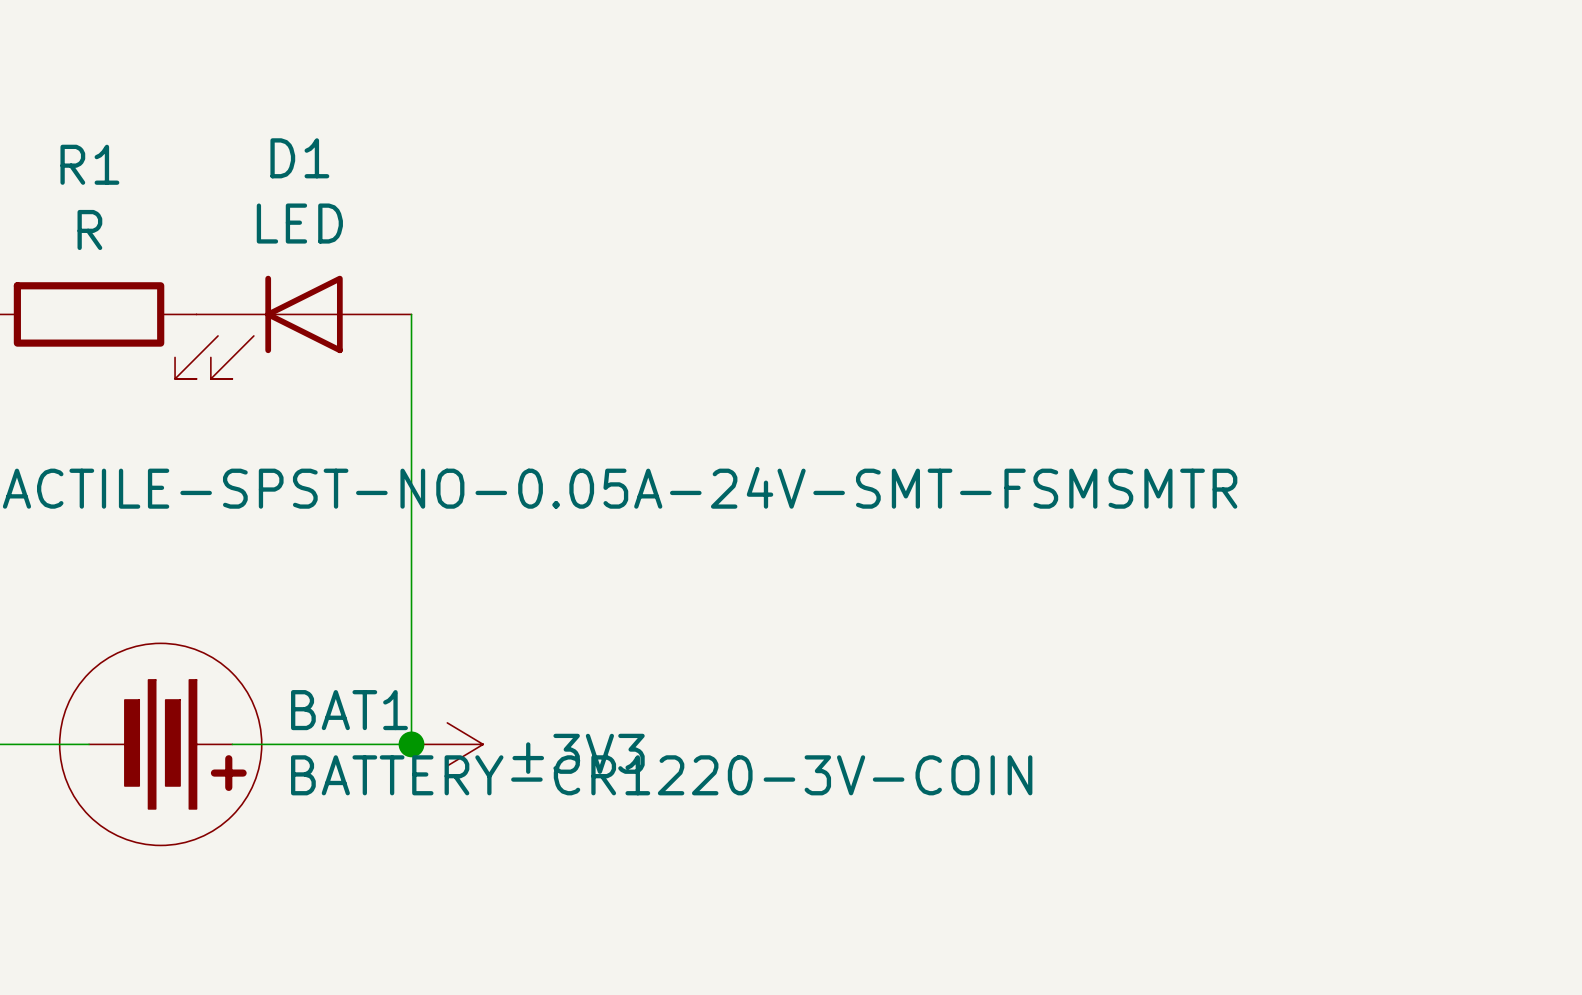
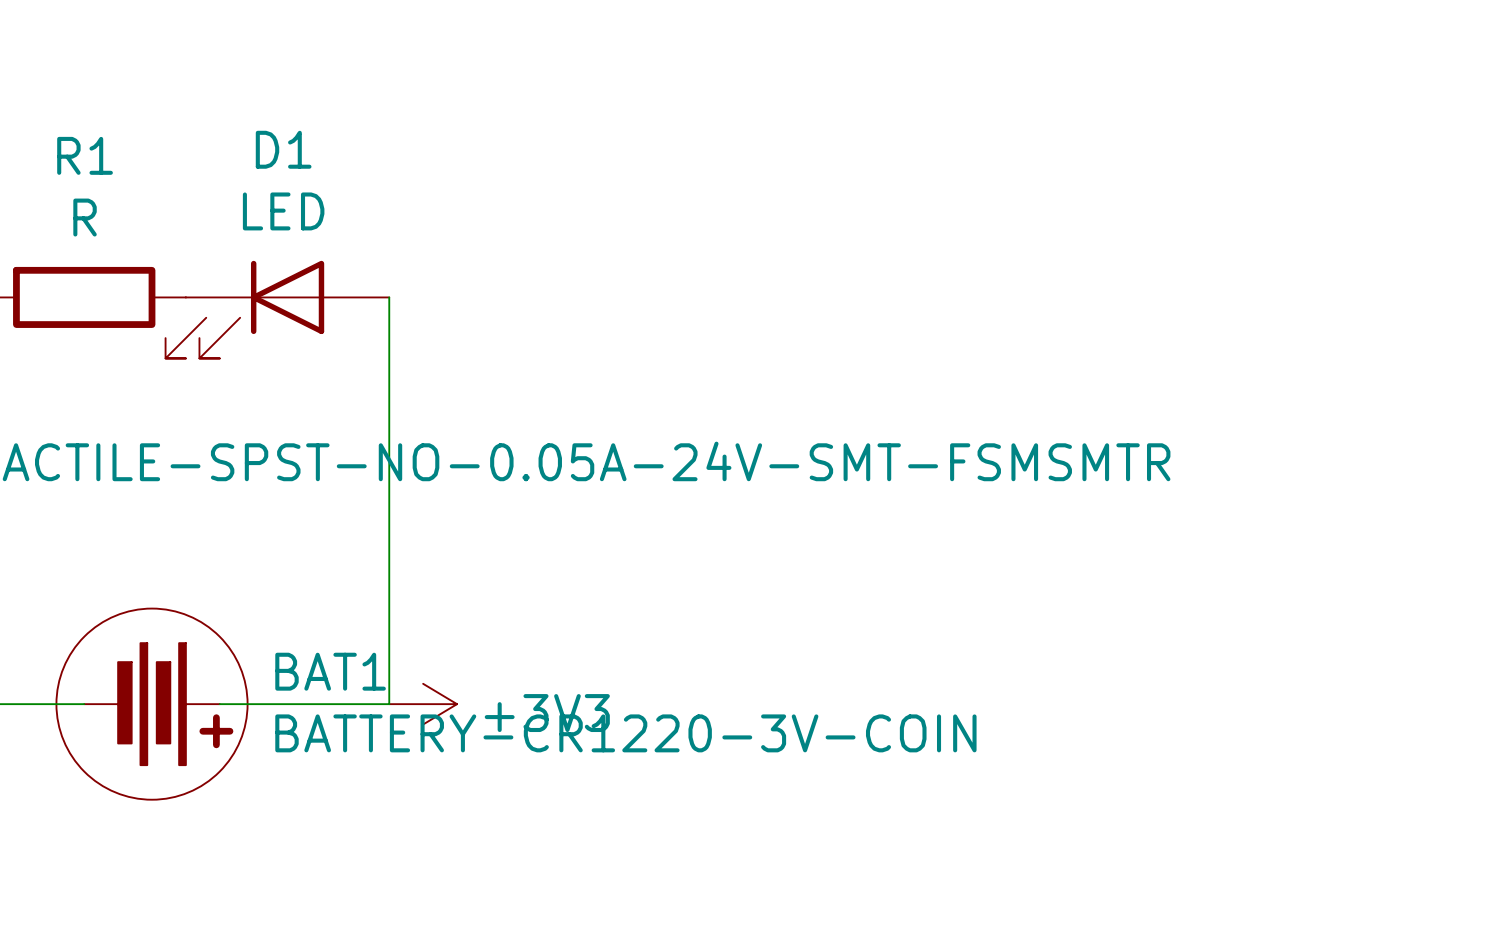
junction: (411, 744) -> none

